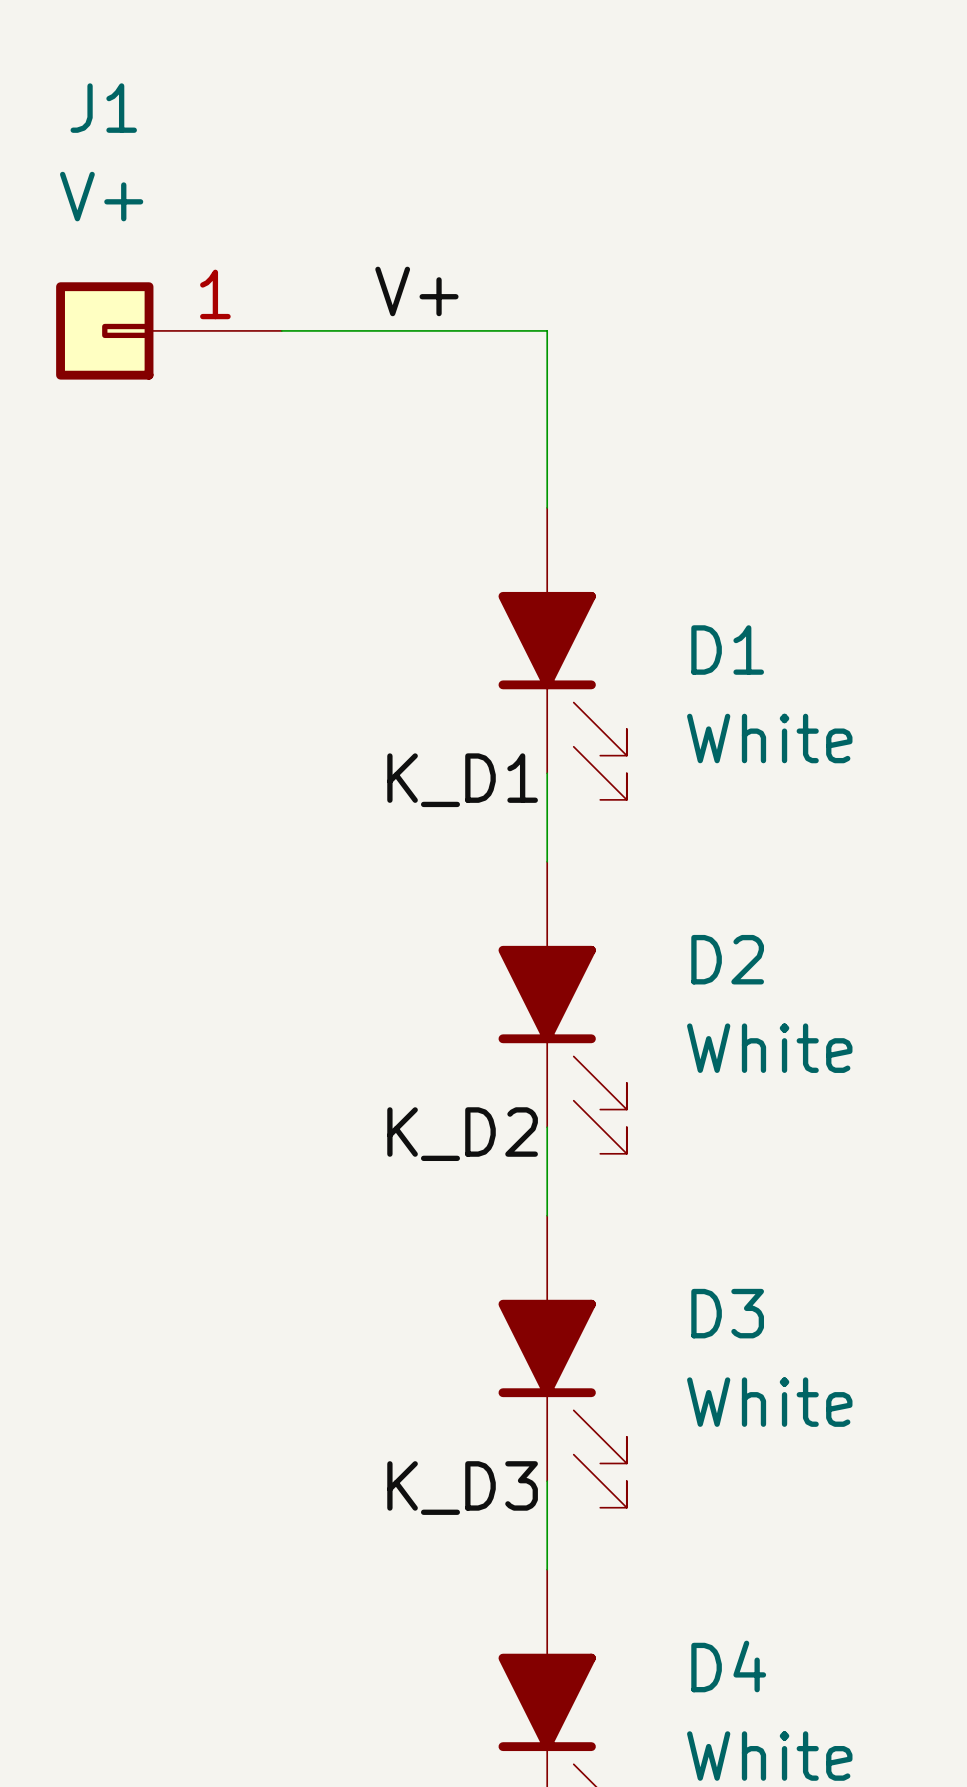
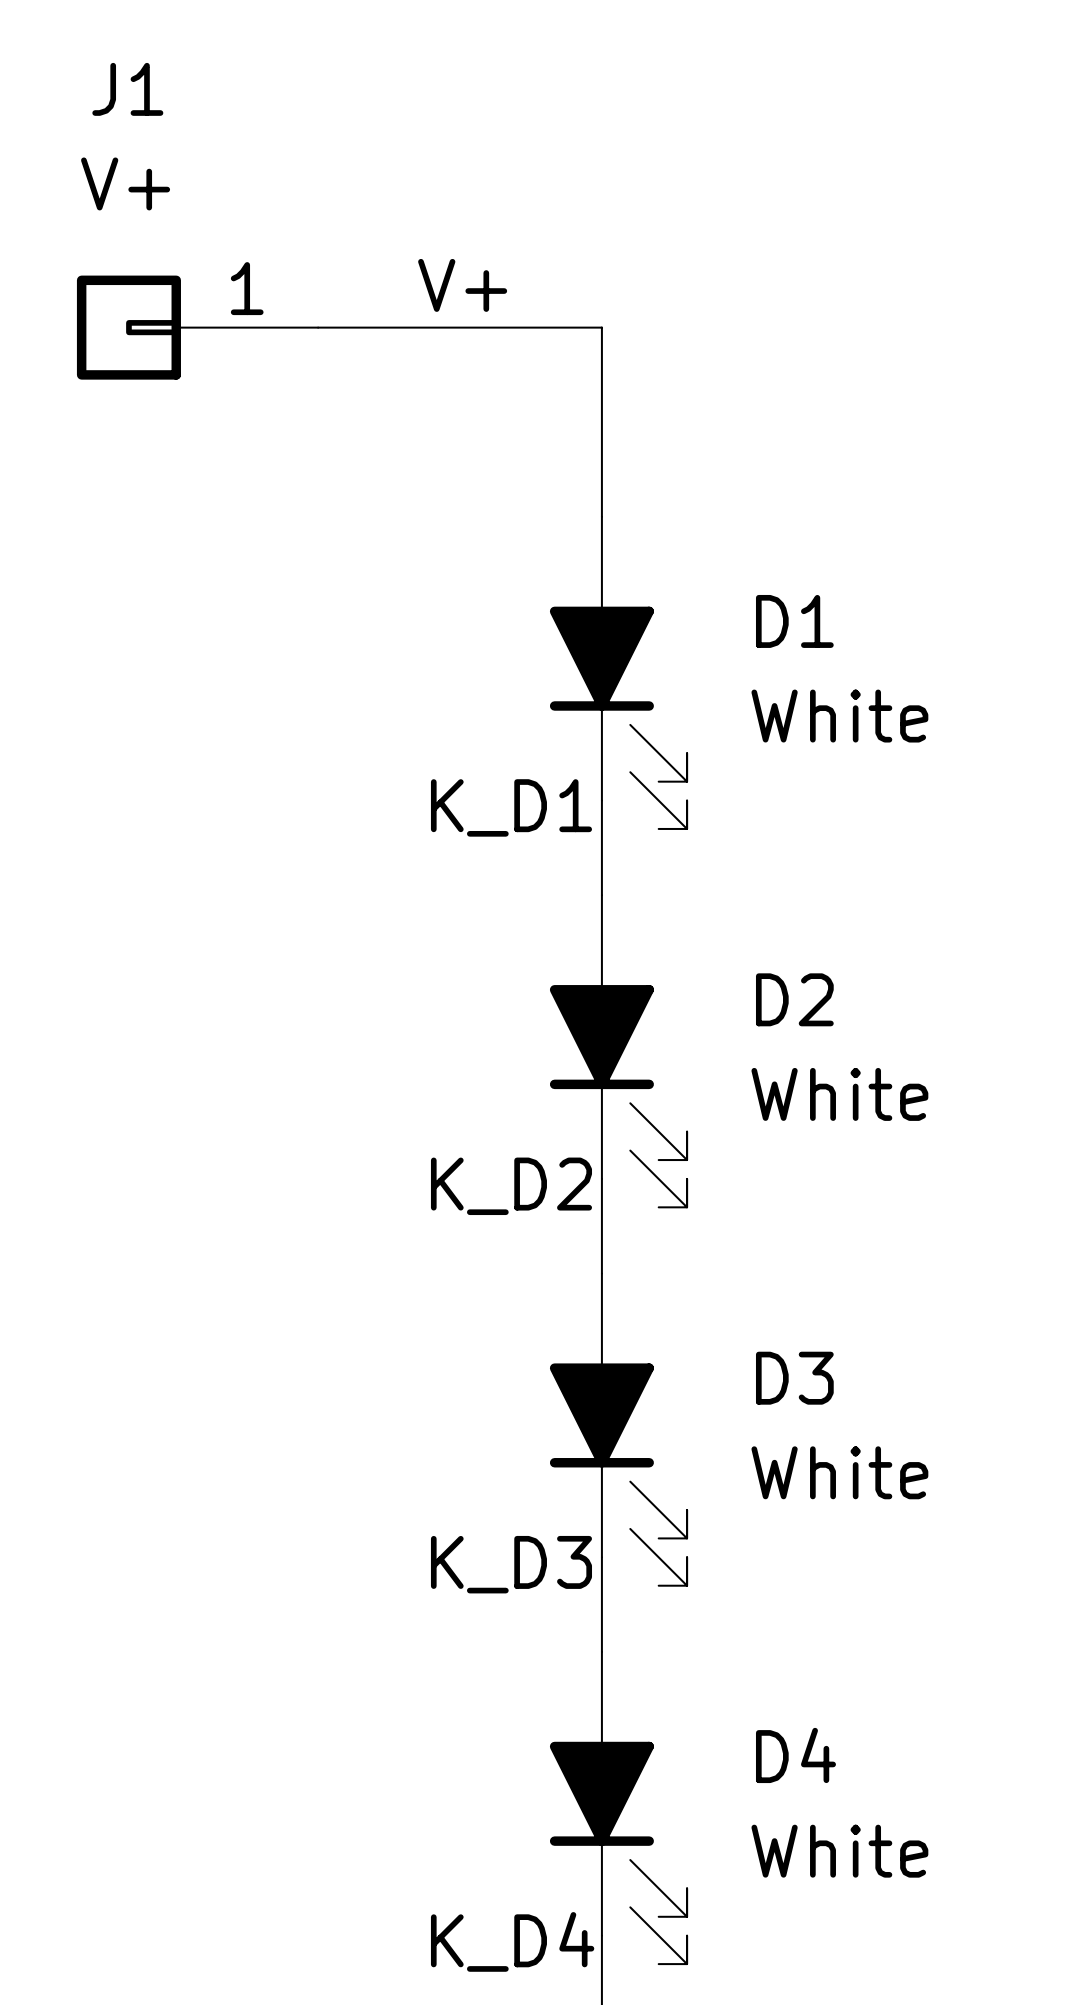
D1 name position: D1 (727, 650) -> D1 (794, 621)
D1 value position: White (769, 738) -> White (839, 716)

